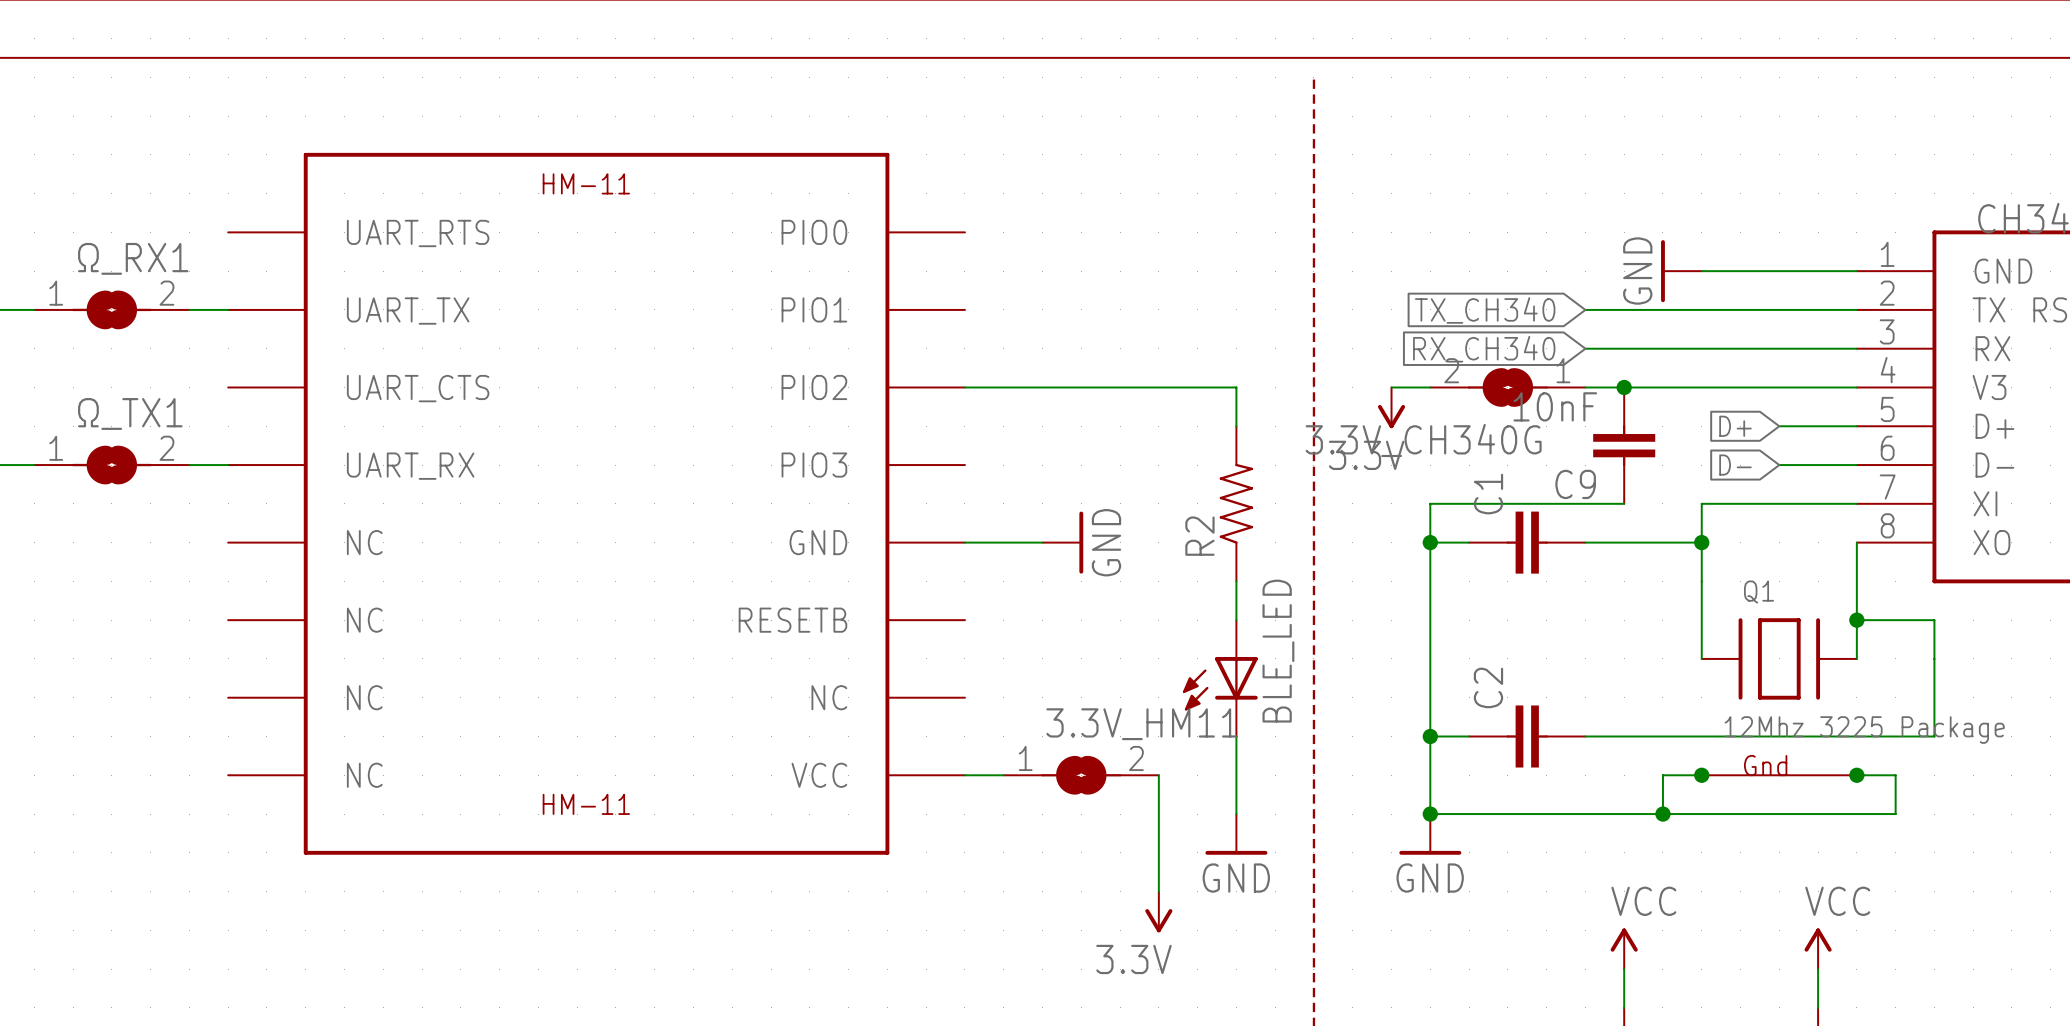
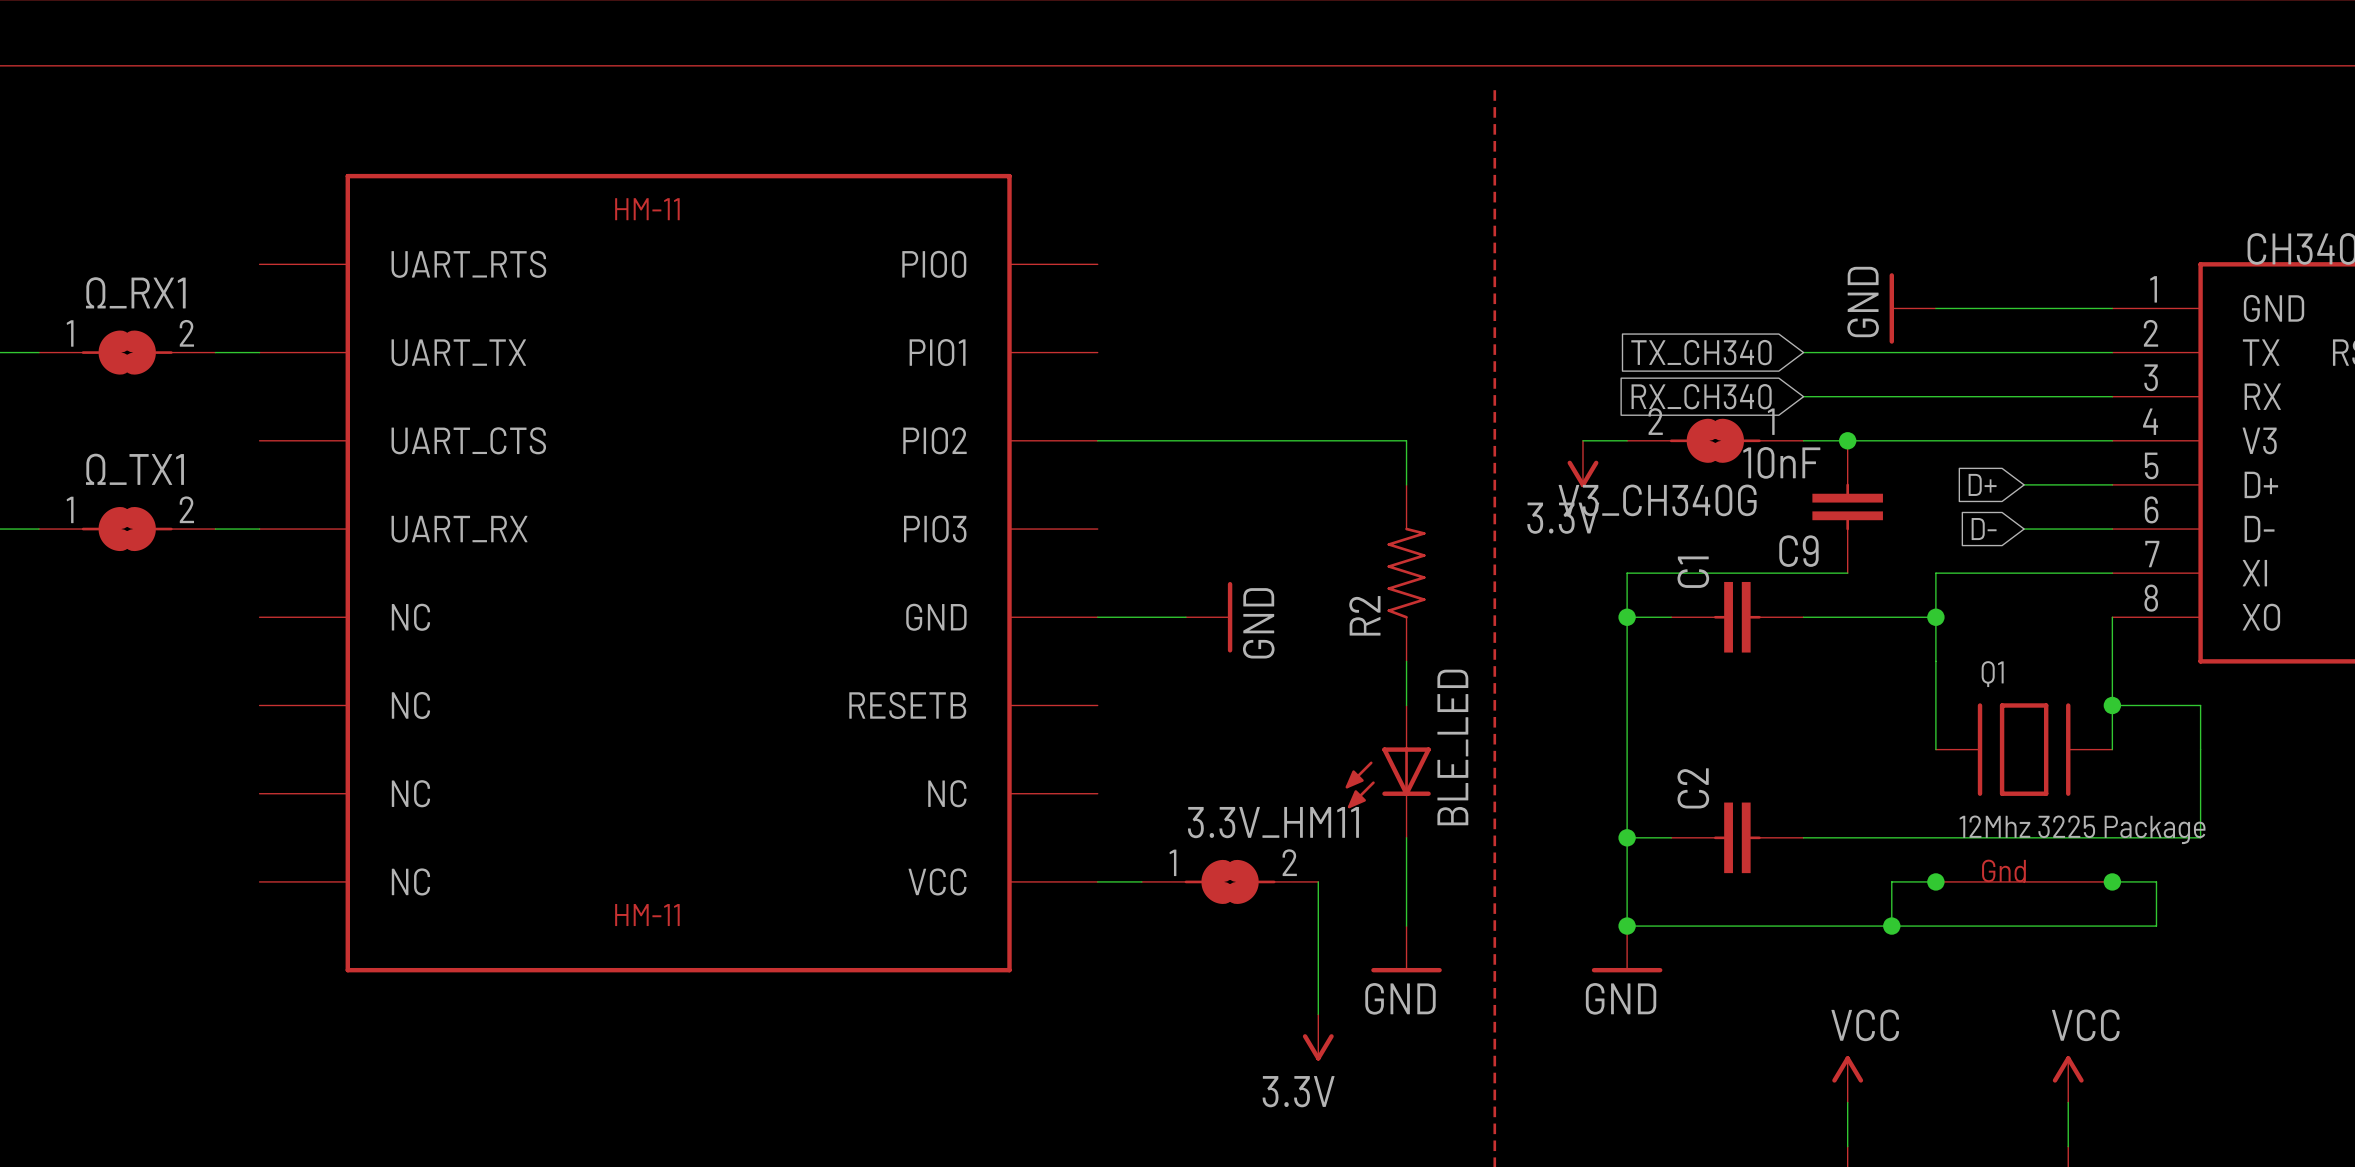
3.3V_CH340G name: 3.3V_CH340G (1423, 440) -> V3_CH340G (1657, 500)

